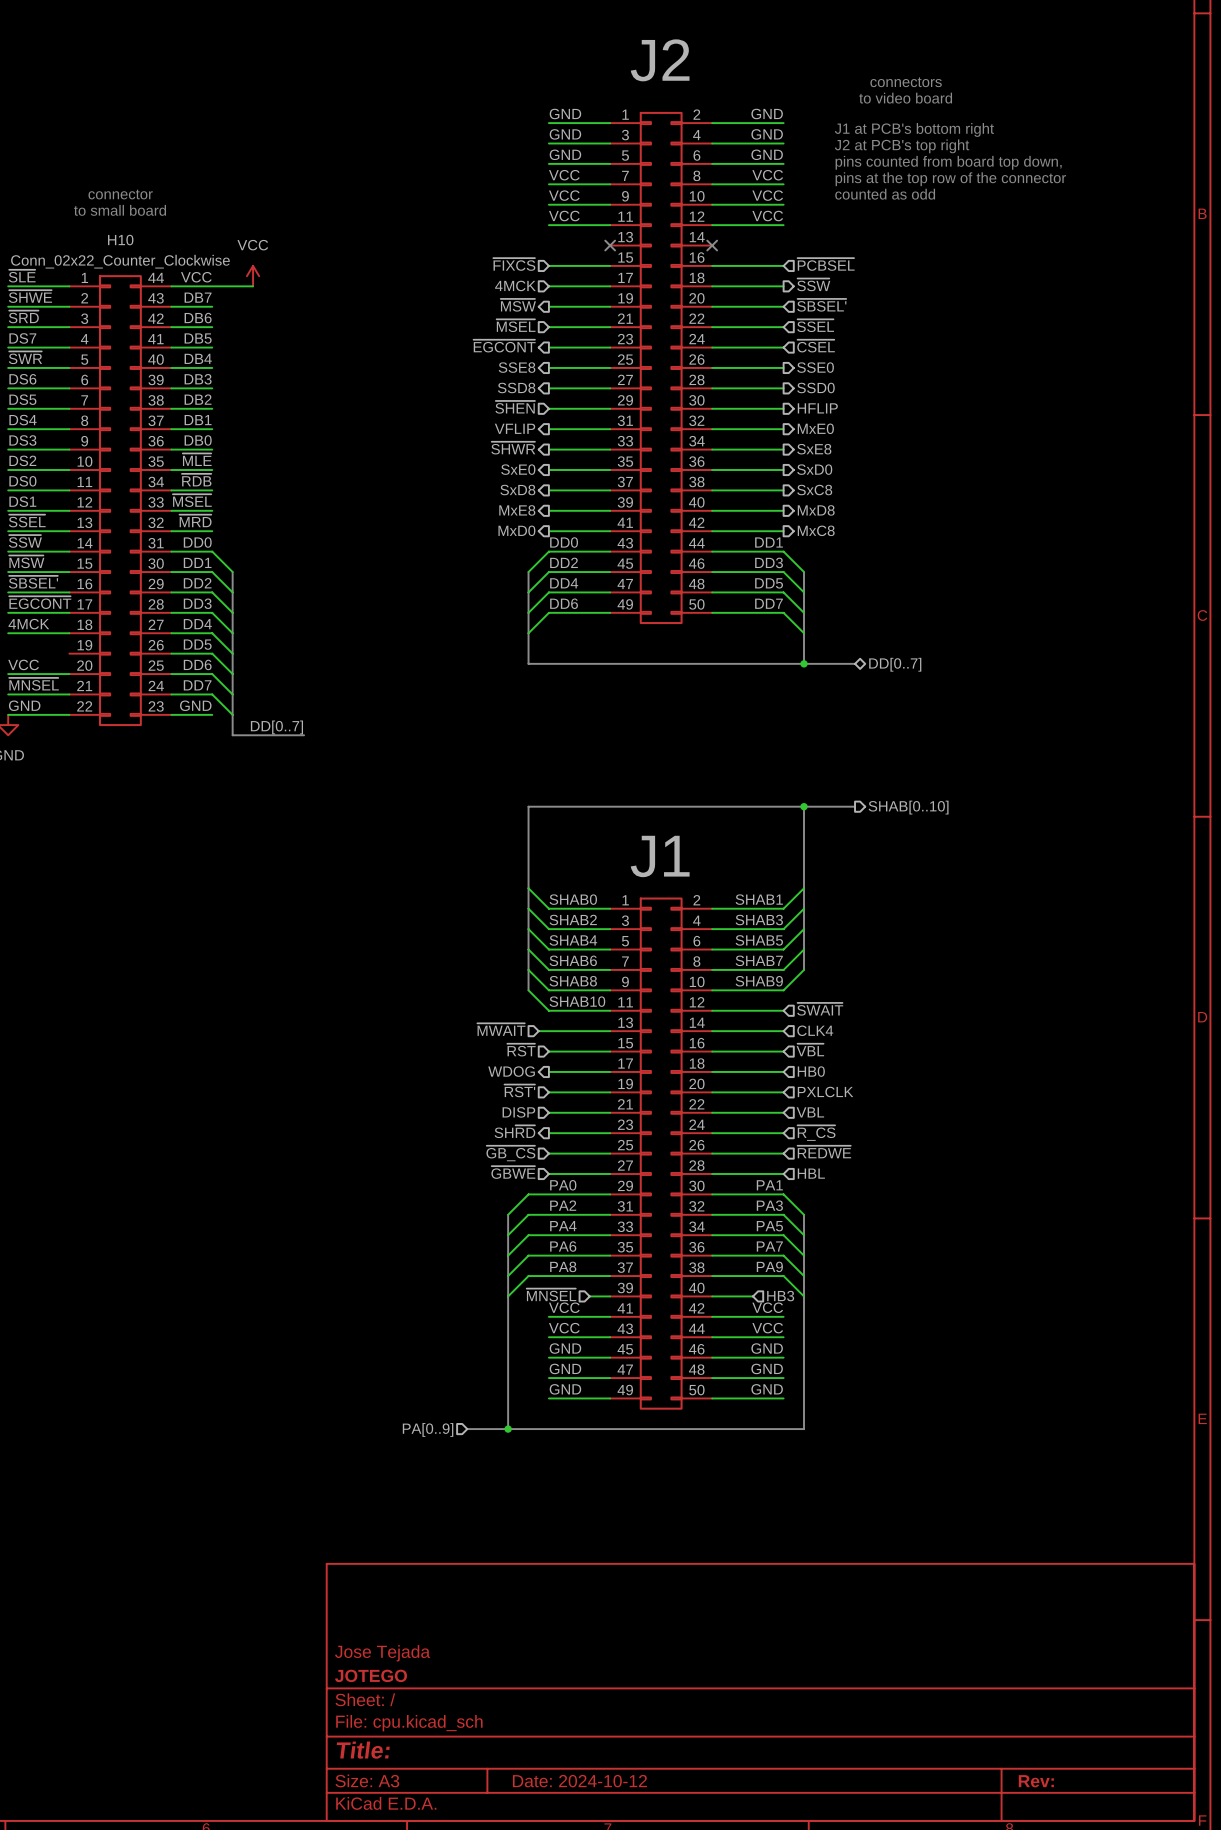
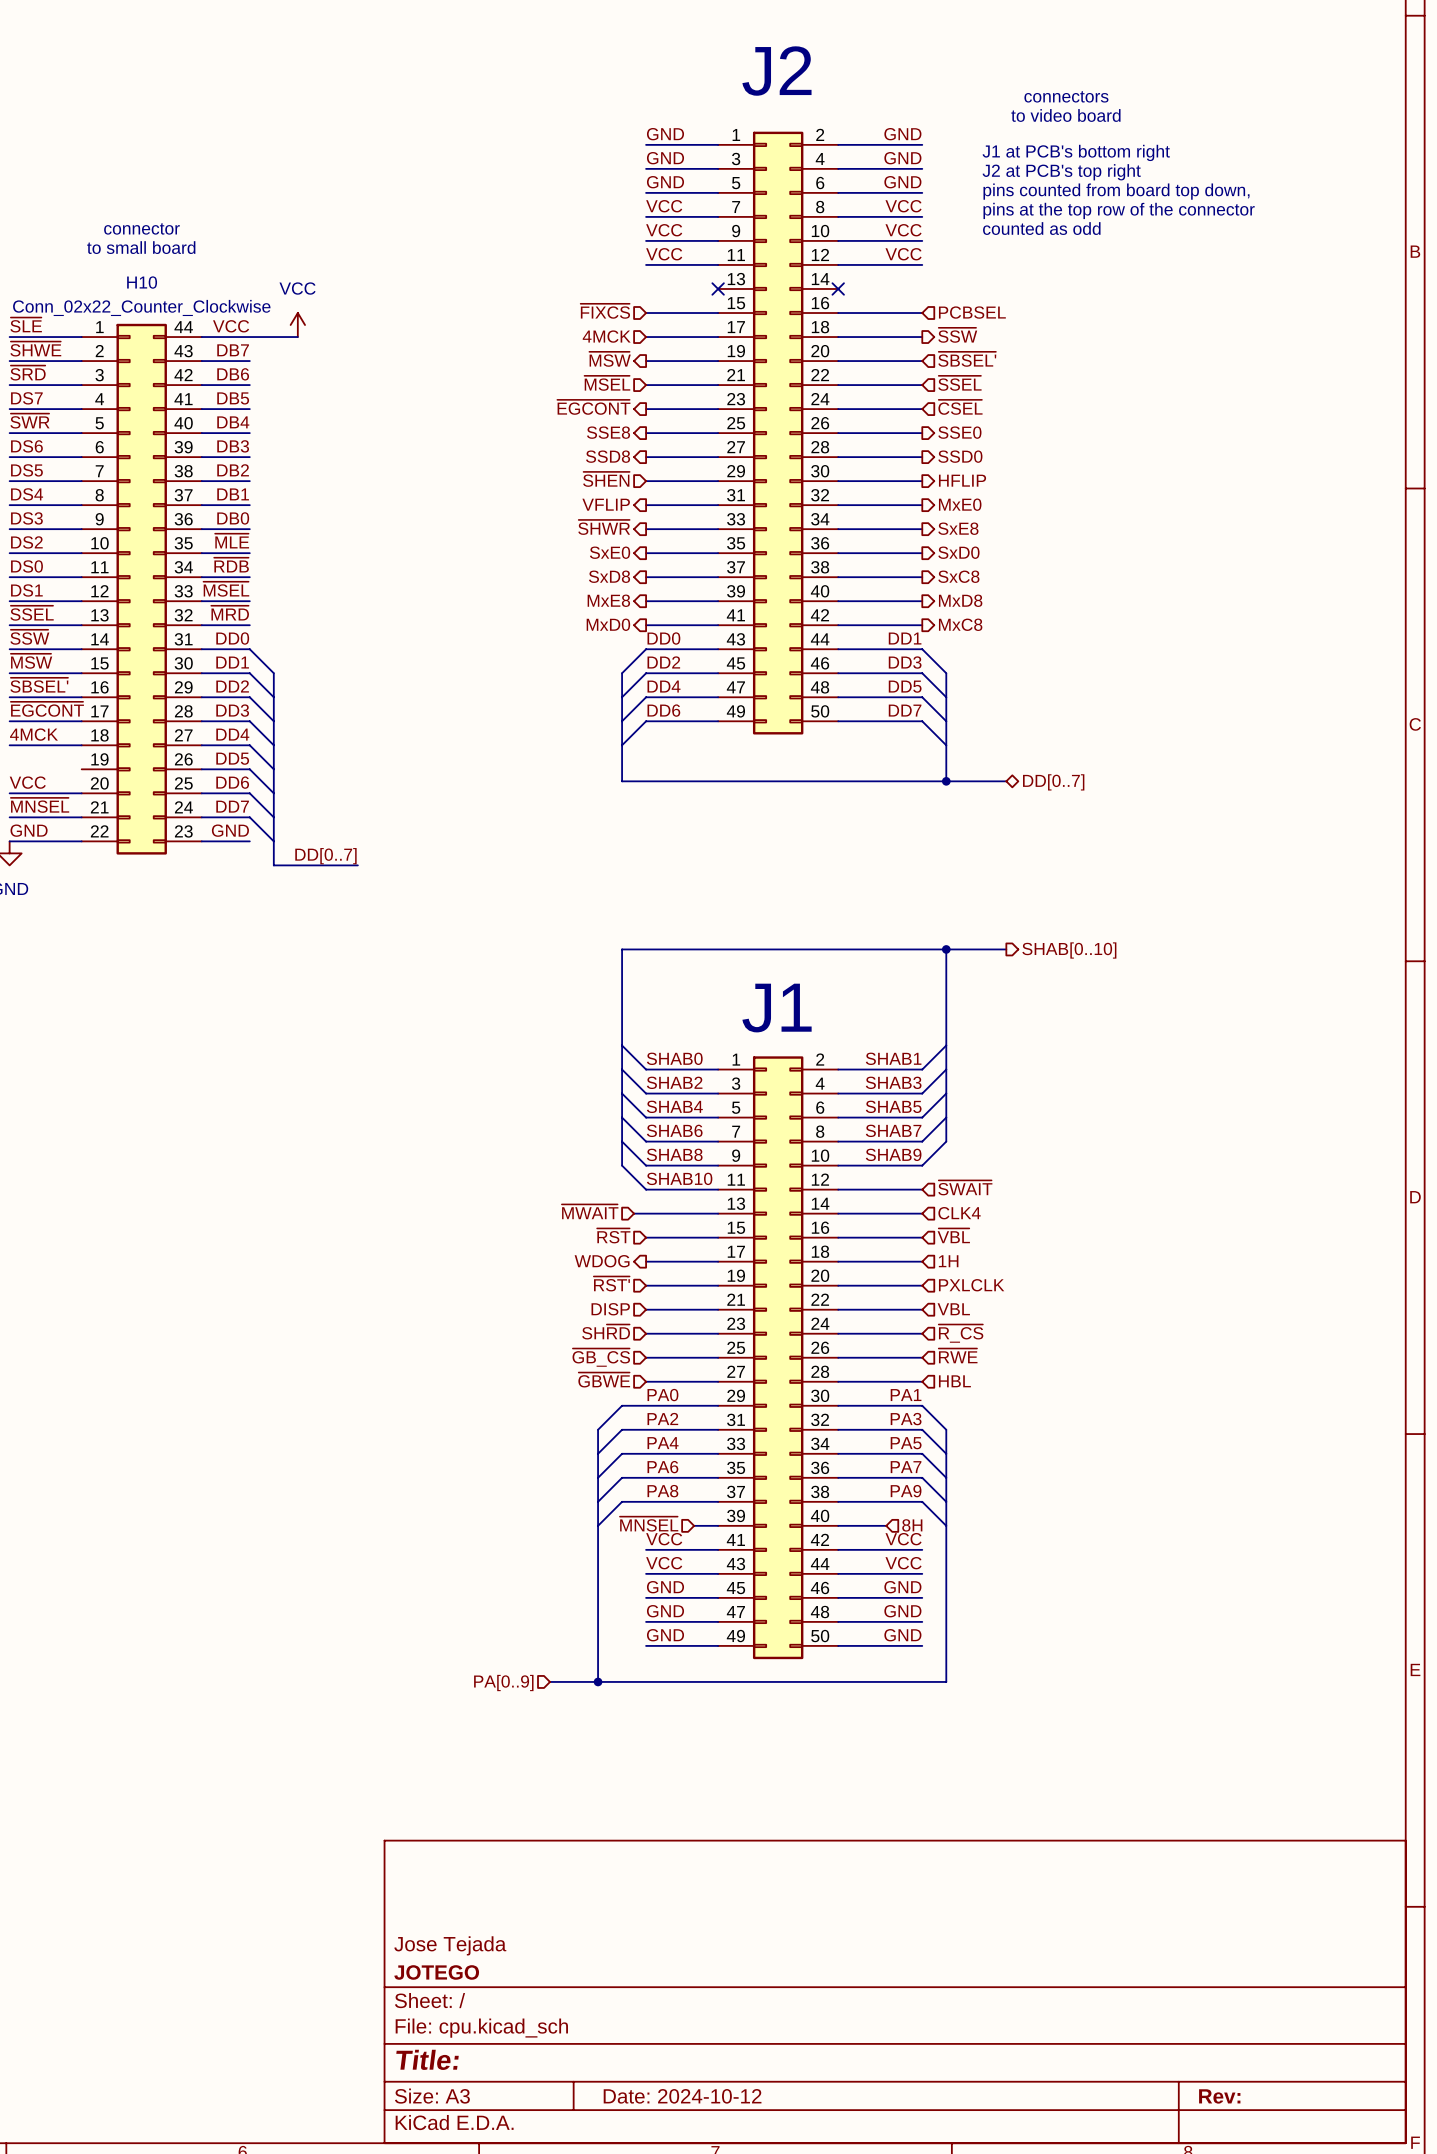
hierarchical label: ~{PCBSEL} (826, 264) -> PCBSEL (972, 312)
hierarchical label: HB0 (811, 1071) -> 1H (948, 1261)
hierarchical label shape: output (514, 1131) -> input (606, 1331)
hierarchical label: ~{REDWE} (824, 1152) -> ~{RWE} (958, 1355)
hierarchical label: HB3 (780, 1296) -> 8H (912, 1525)

